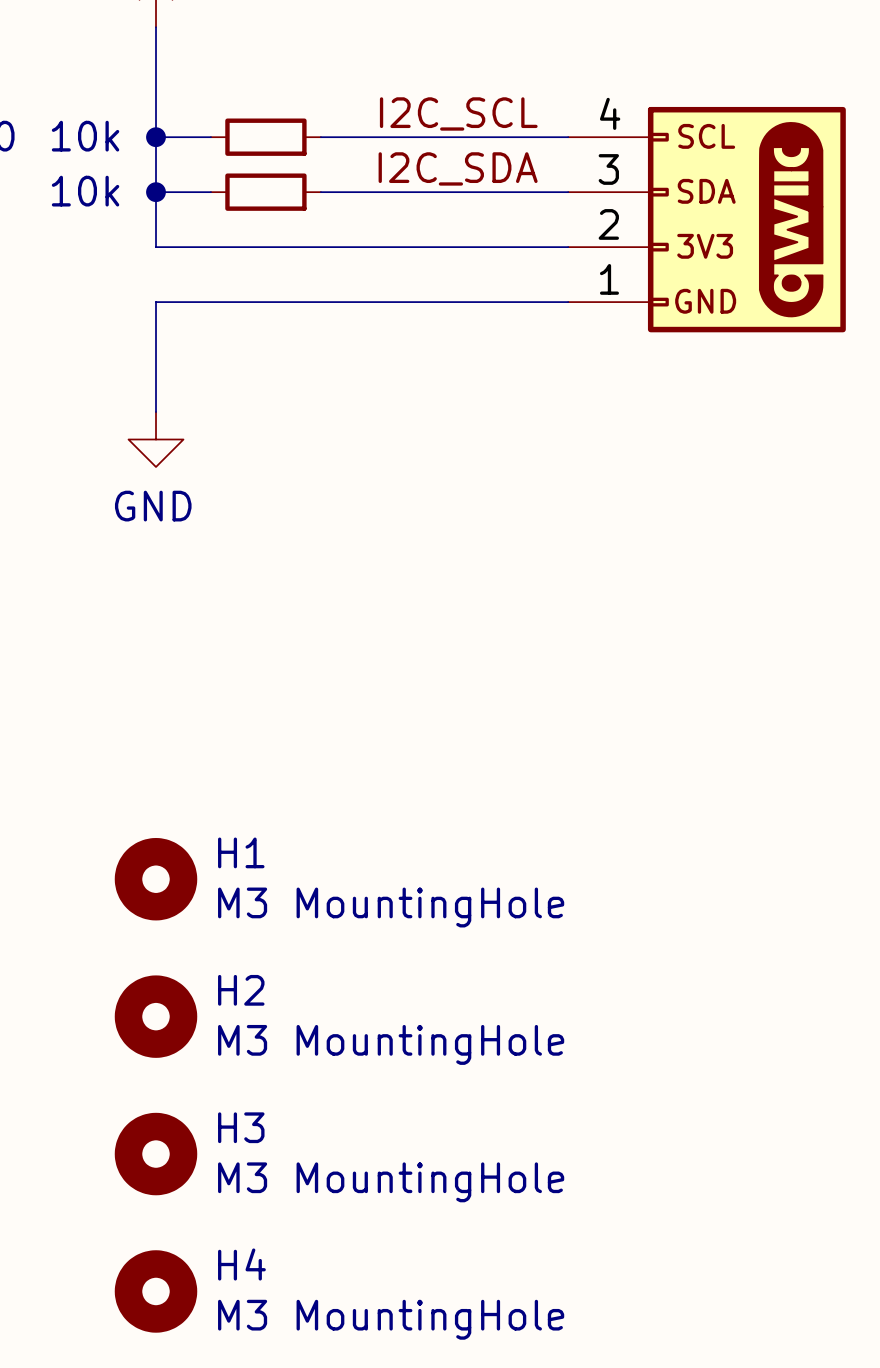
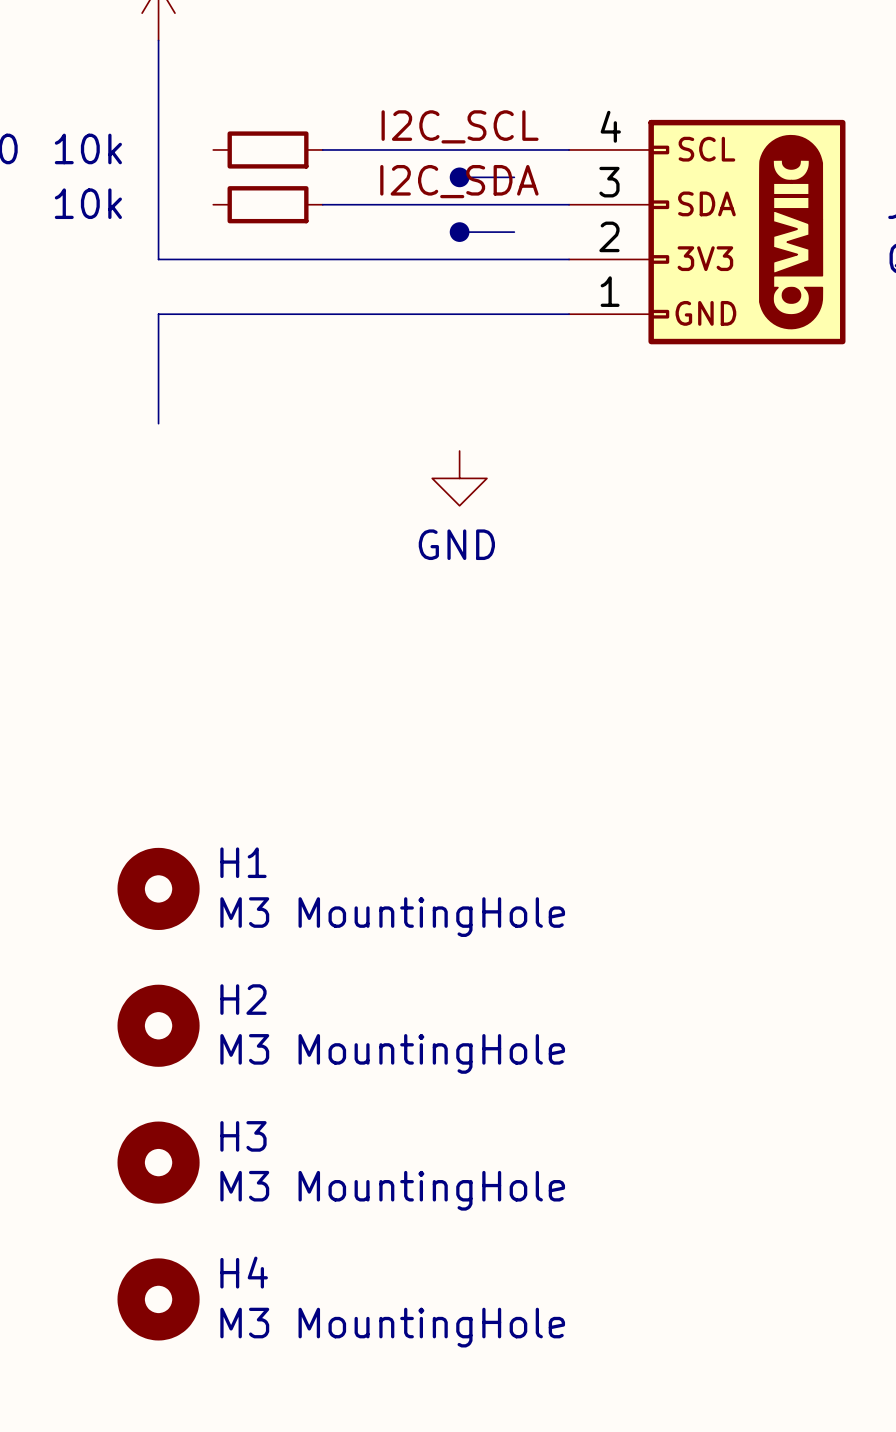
wire: (156, 137) (210, 137) -> (459, 177) (514, 177)
junction: (156, 137) -> none
junction: none -> (459, 177)
wire: (156, 192) (210, 192) -> (459, 232) (514, 232)
junction: (156, 192) -> none
junction: none -> (459, 232)
power symbol position: GND (156, 439) -> GND (459, 478)

